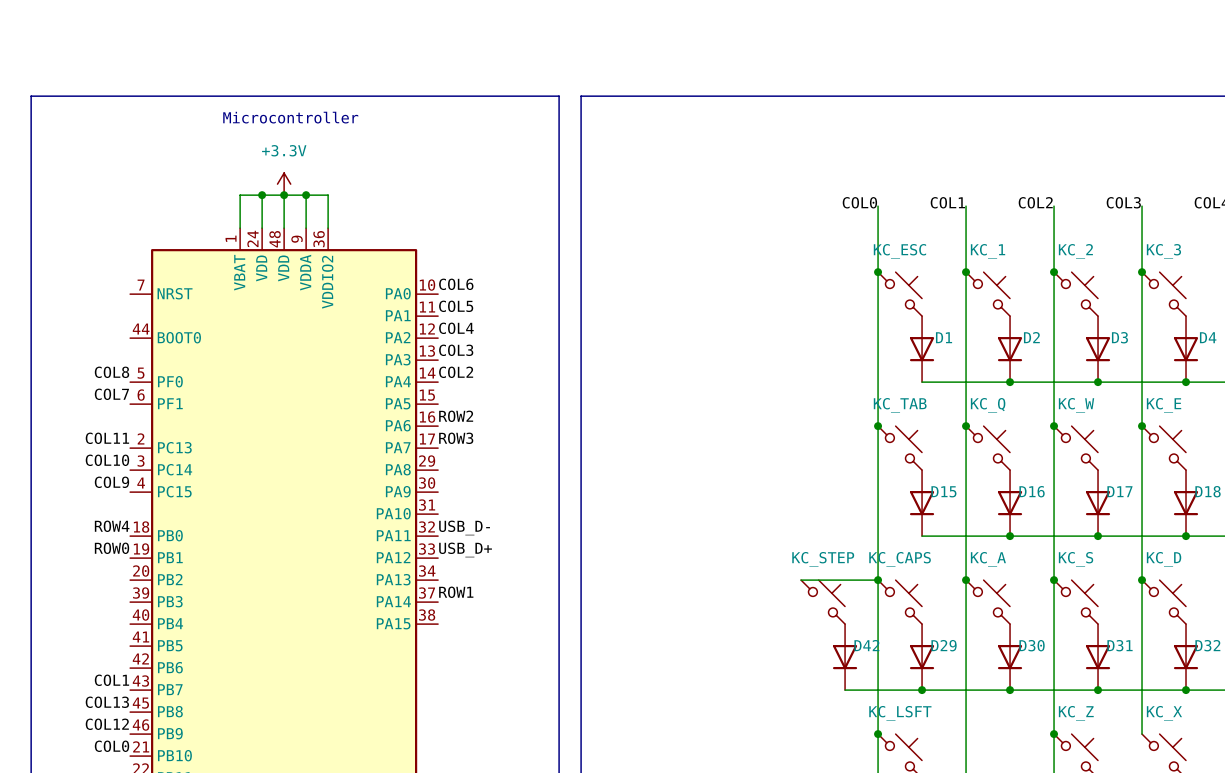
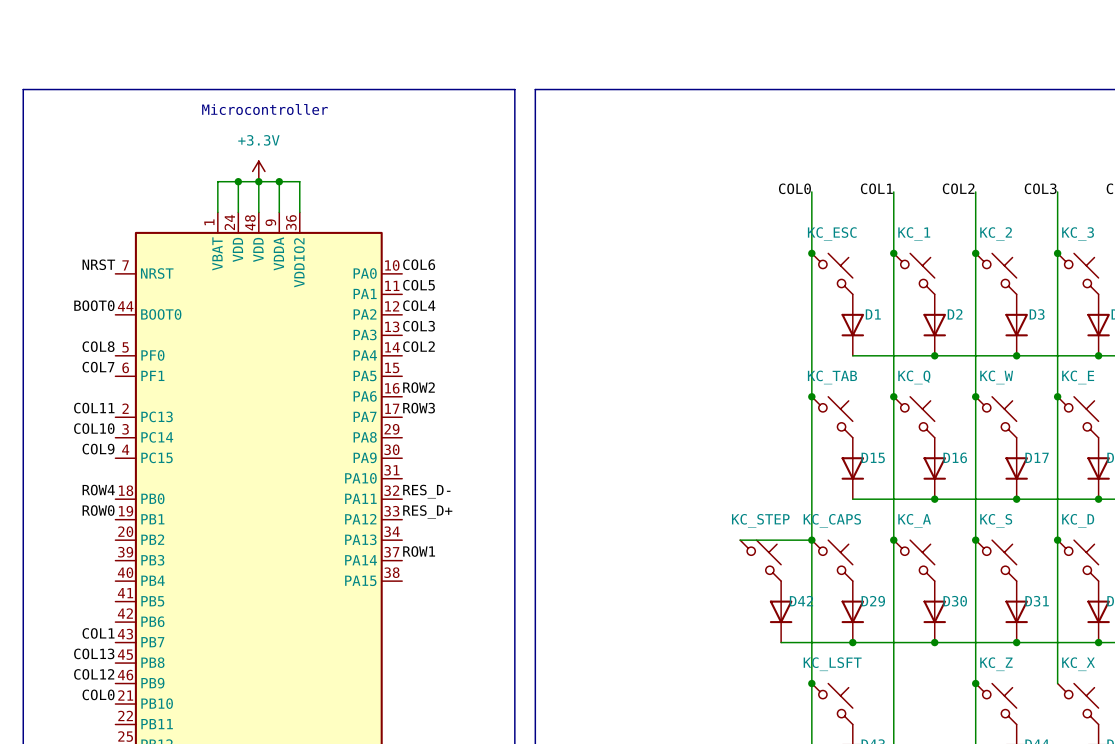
label: none -> NRST (98, 264)
label: none -> BOOT0 (94, 305)
label: USB_D- (464, 527) -> RES_D- (426, 491)
label: USB_D+ (465, 549) -> RES_D+ (427, 512)

